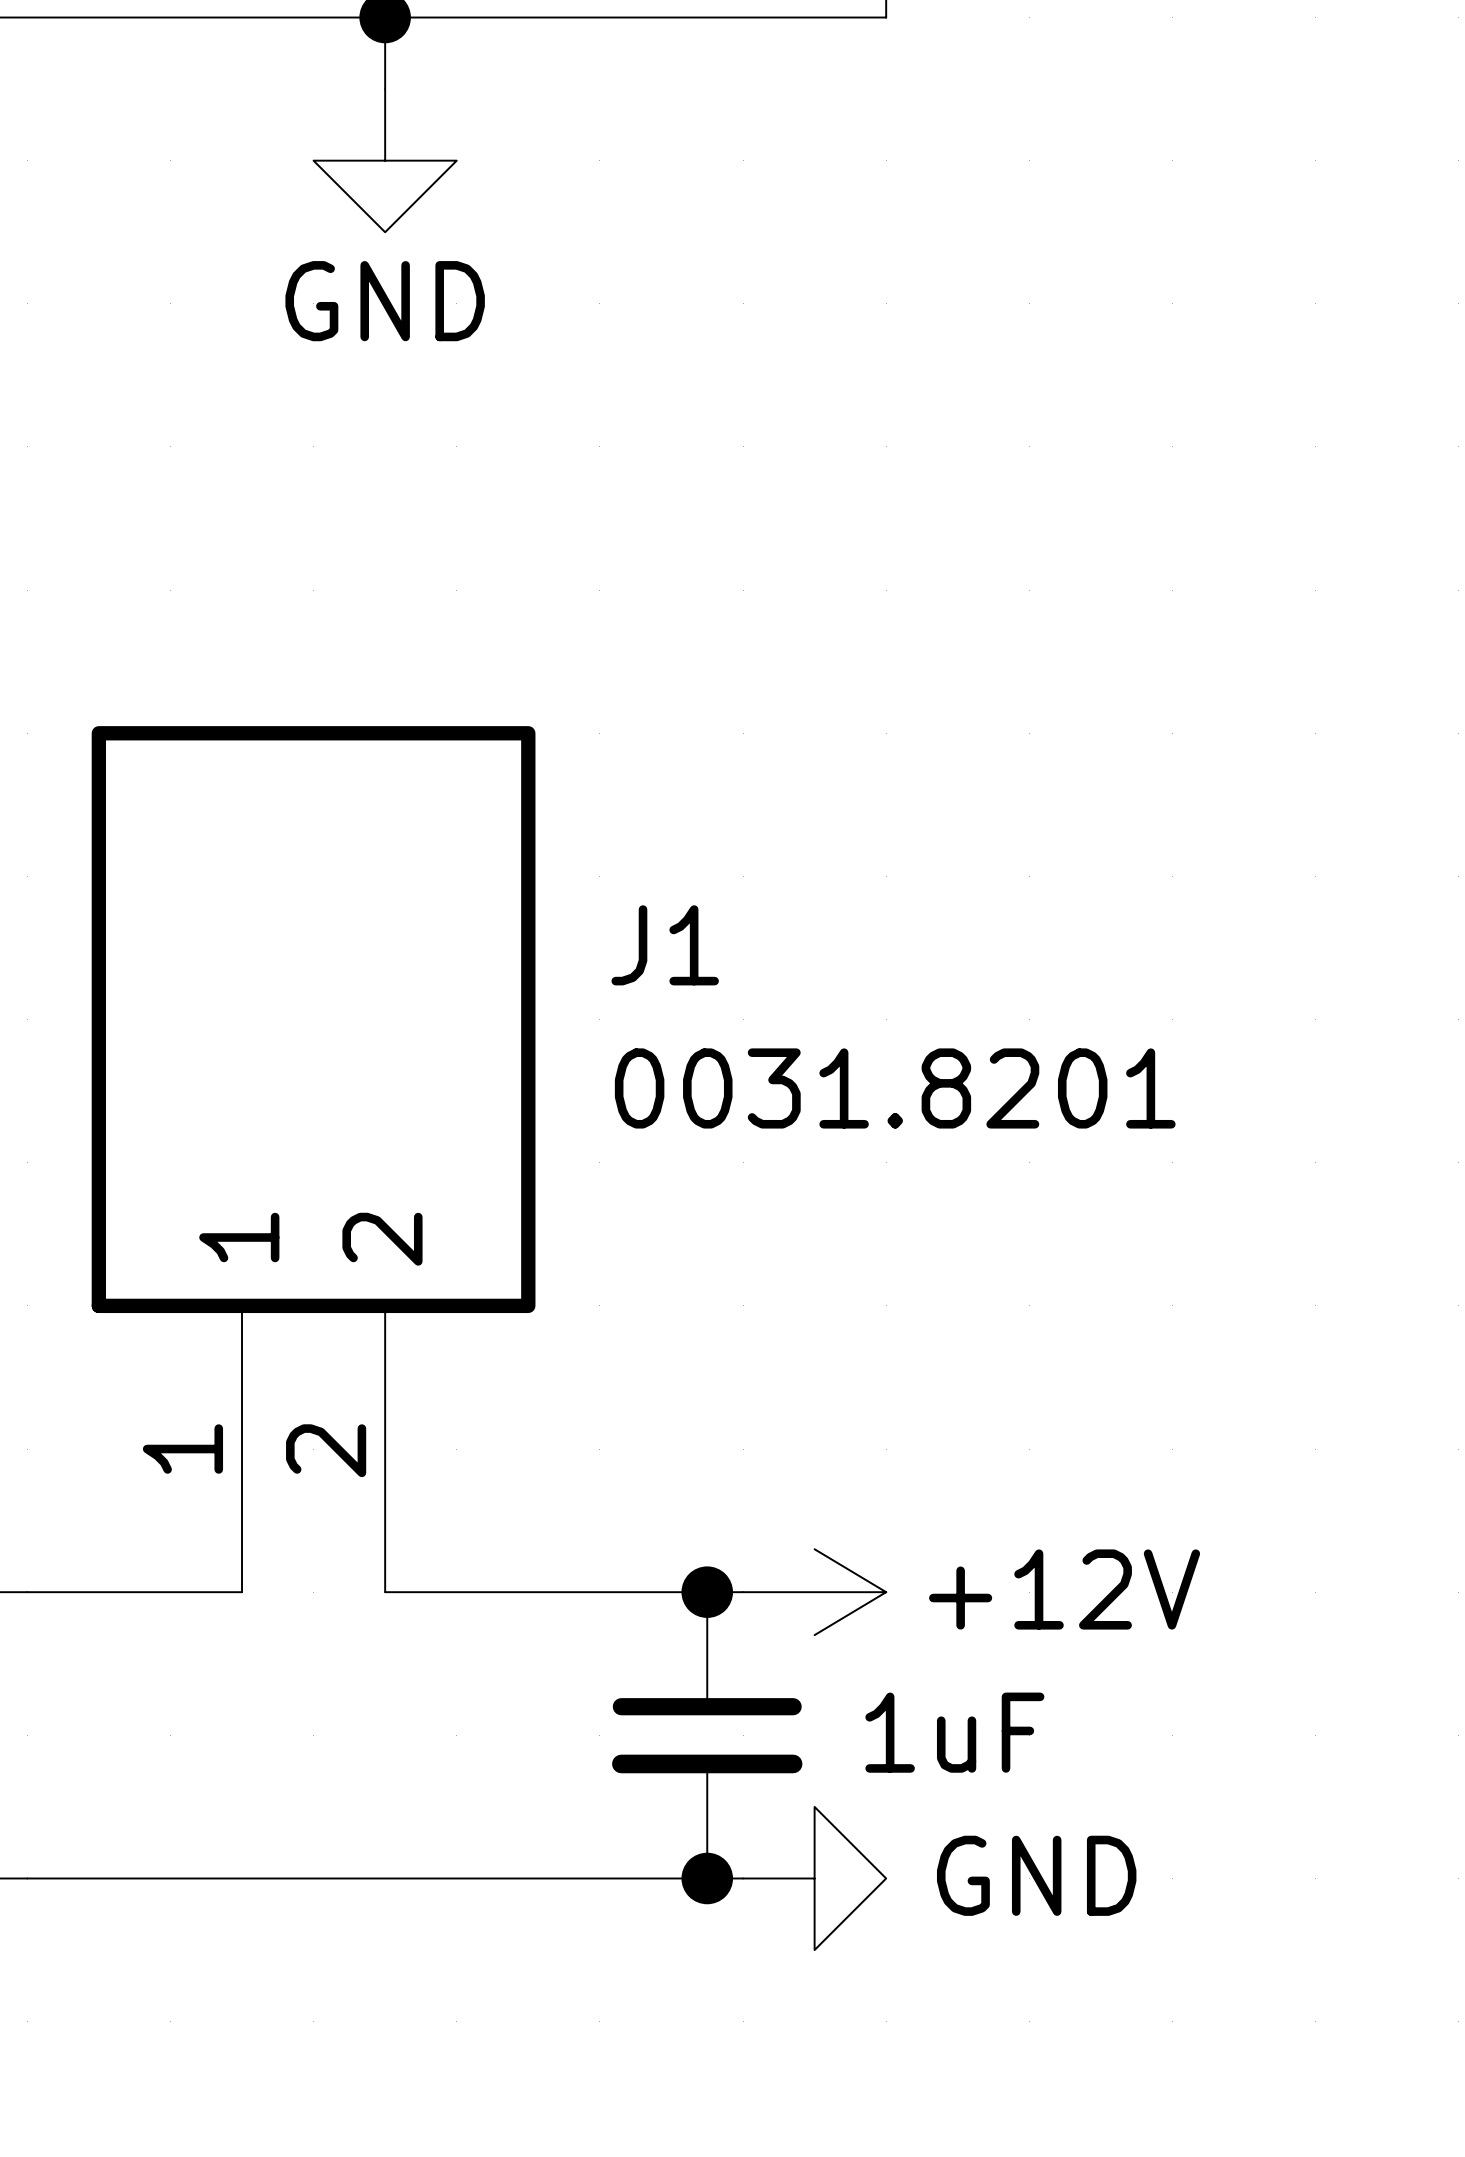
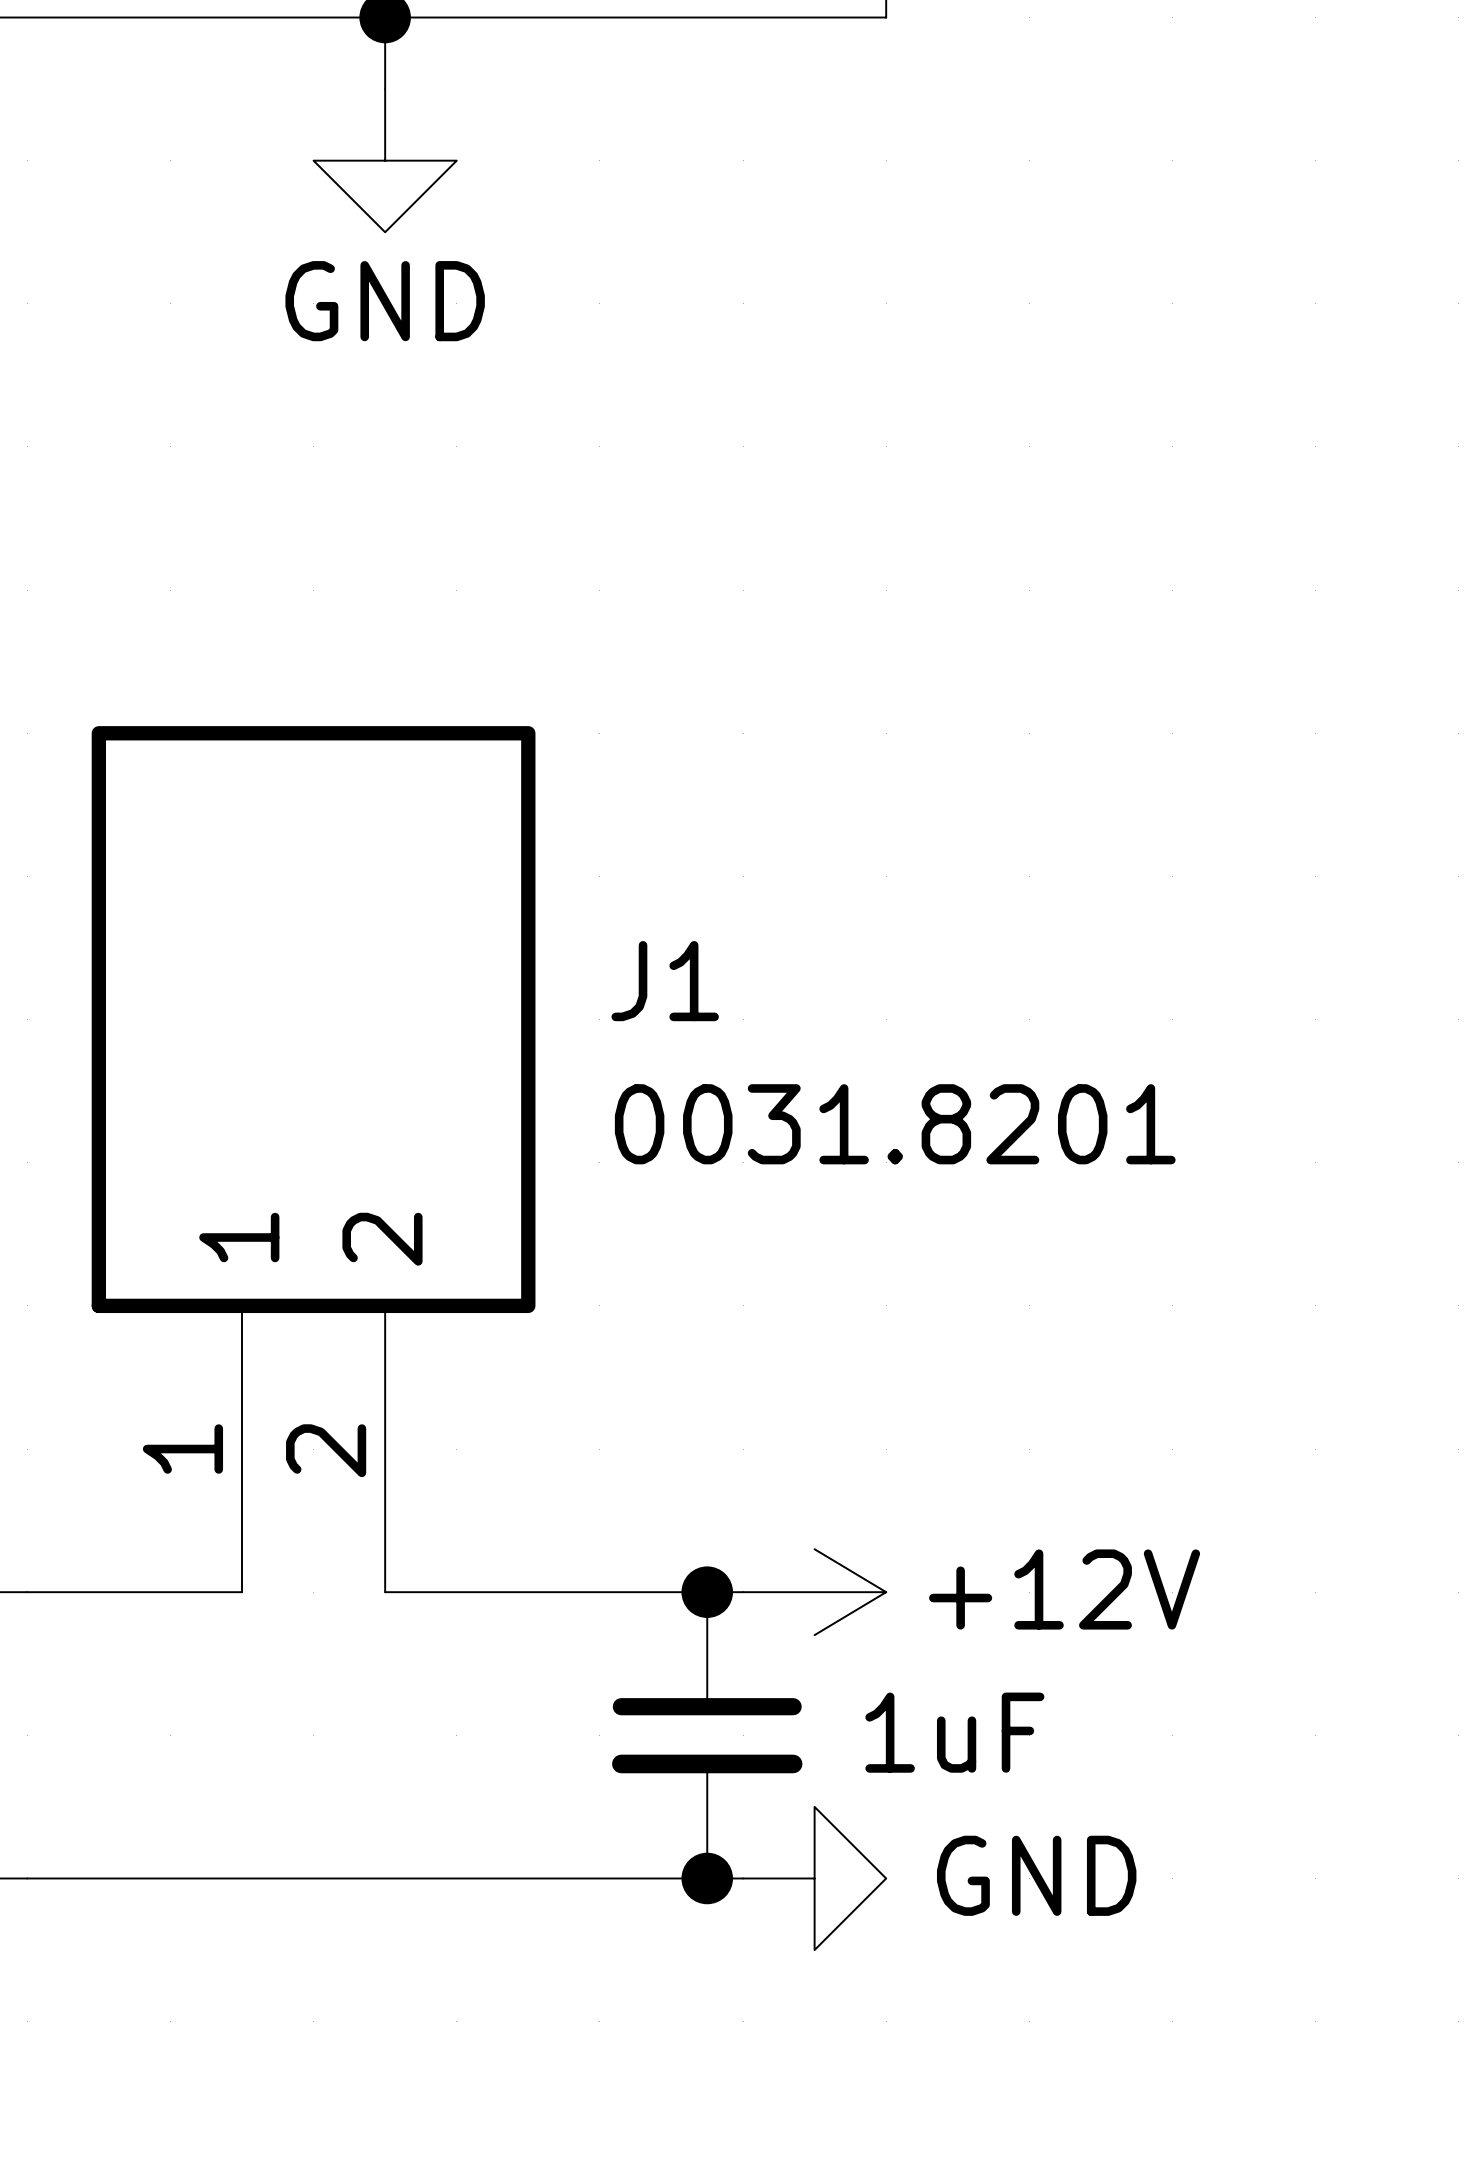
J1 name position: J1 (665, 945) -> J1 (665, 981)
J1 value position: 0031.8201 (895, 1088) -> 0031.8201 (895, 1124)

